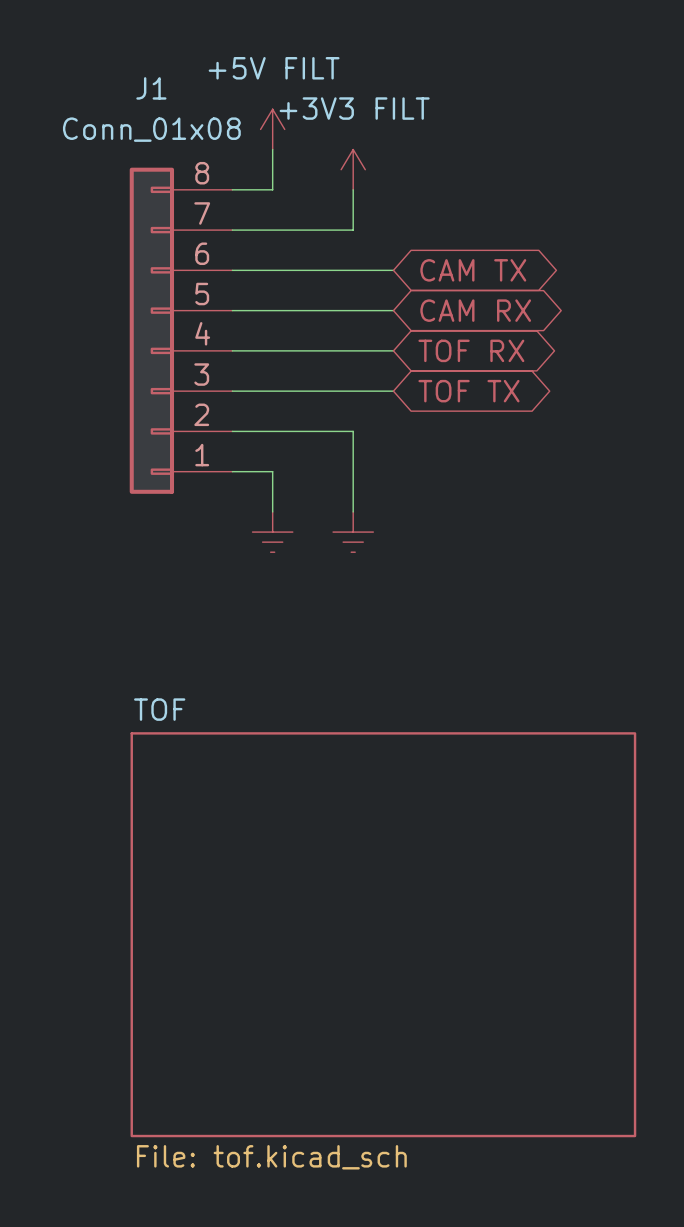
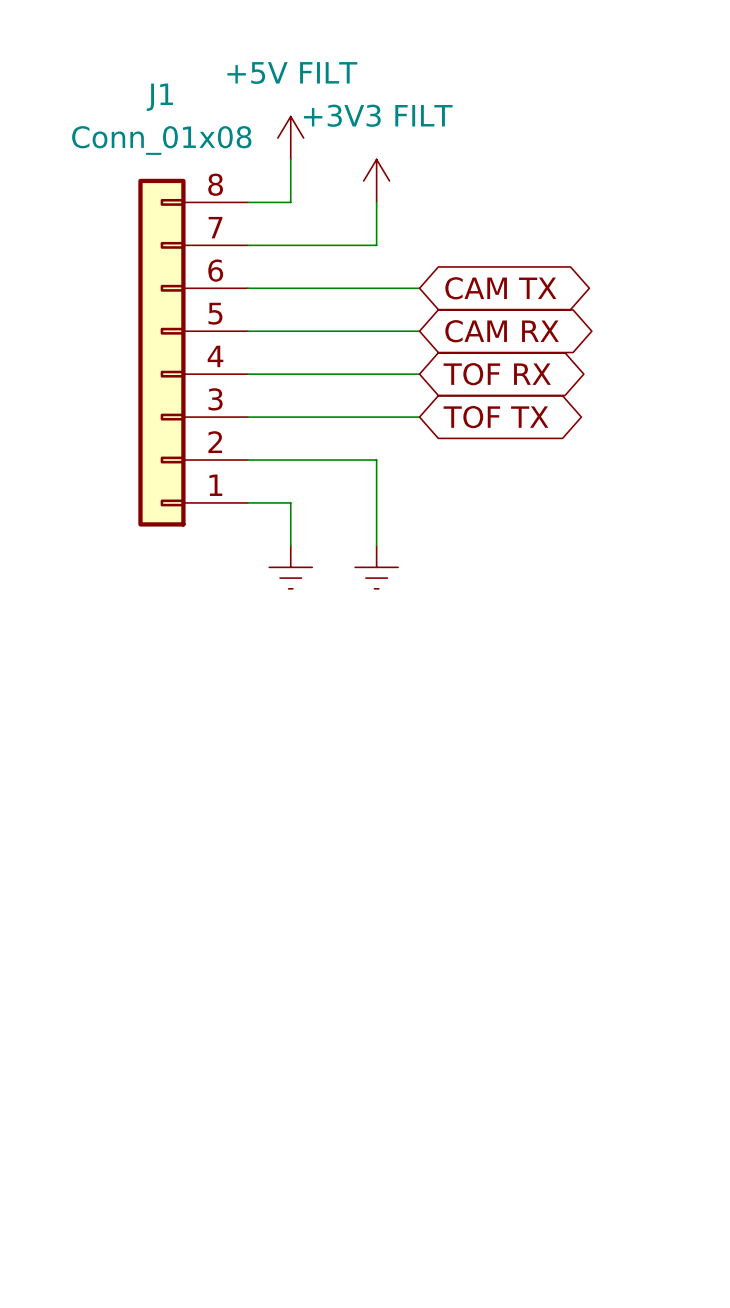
sheet TOF: File: tof.kicad_sch (383, 934) -> none

